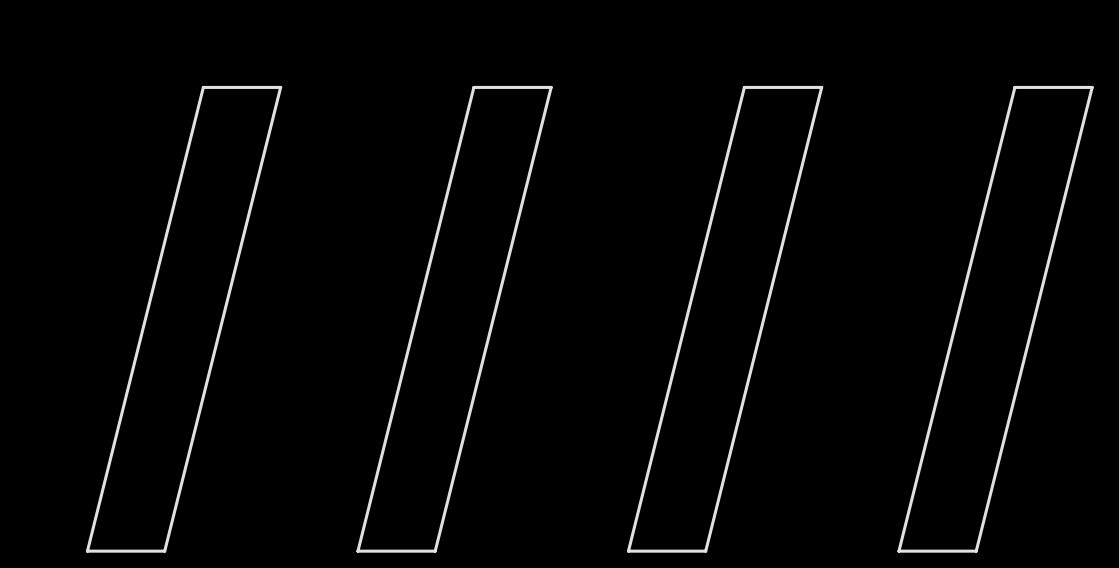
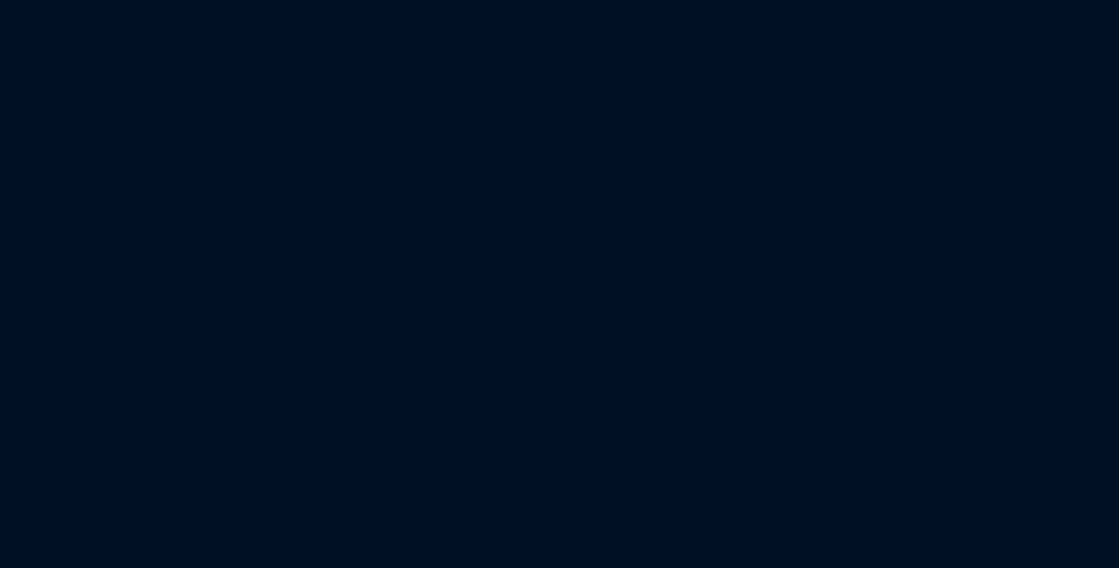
line: (280, 87) (203, 87) (87, 551) (164, 551) (280, 87) -> none
line: (551, 87) (473, 87) (357, 551) (435, 551) (551, 87) -> none
line: (821, 87) (744, 87) (628, 551) (705, 551) (821, 87) -> none
line: (1092, 87) (1014, 87) (898, 551) (976, 551) (1092, 87) -> none

